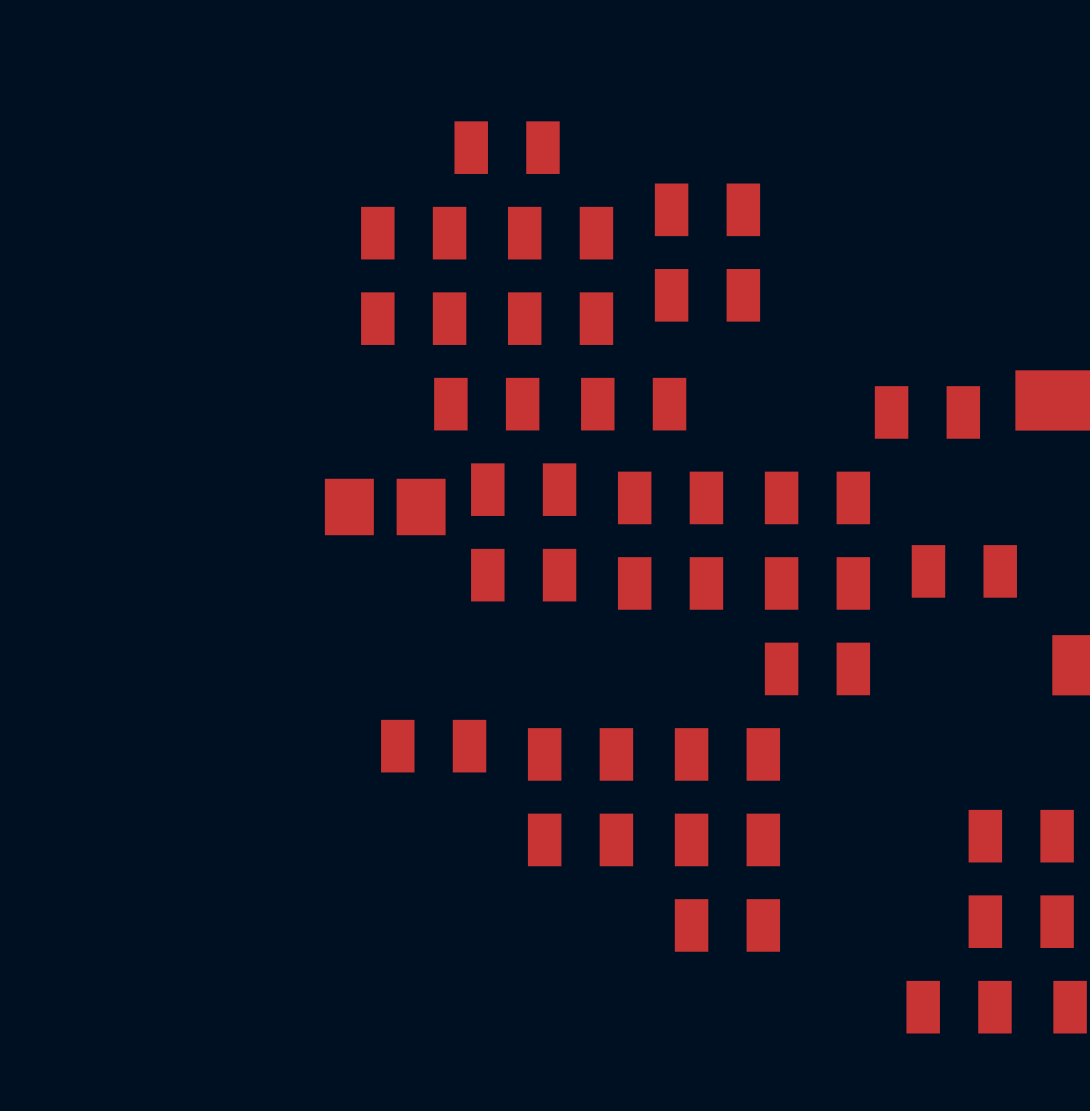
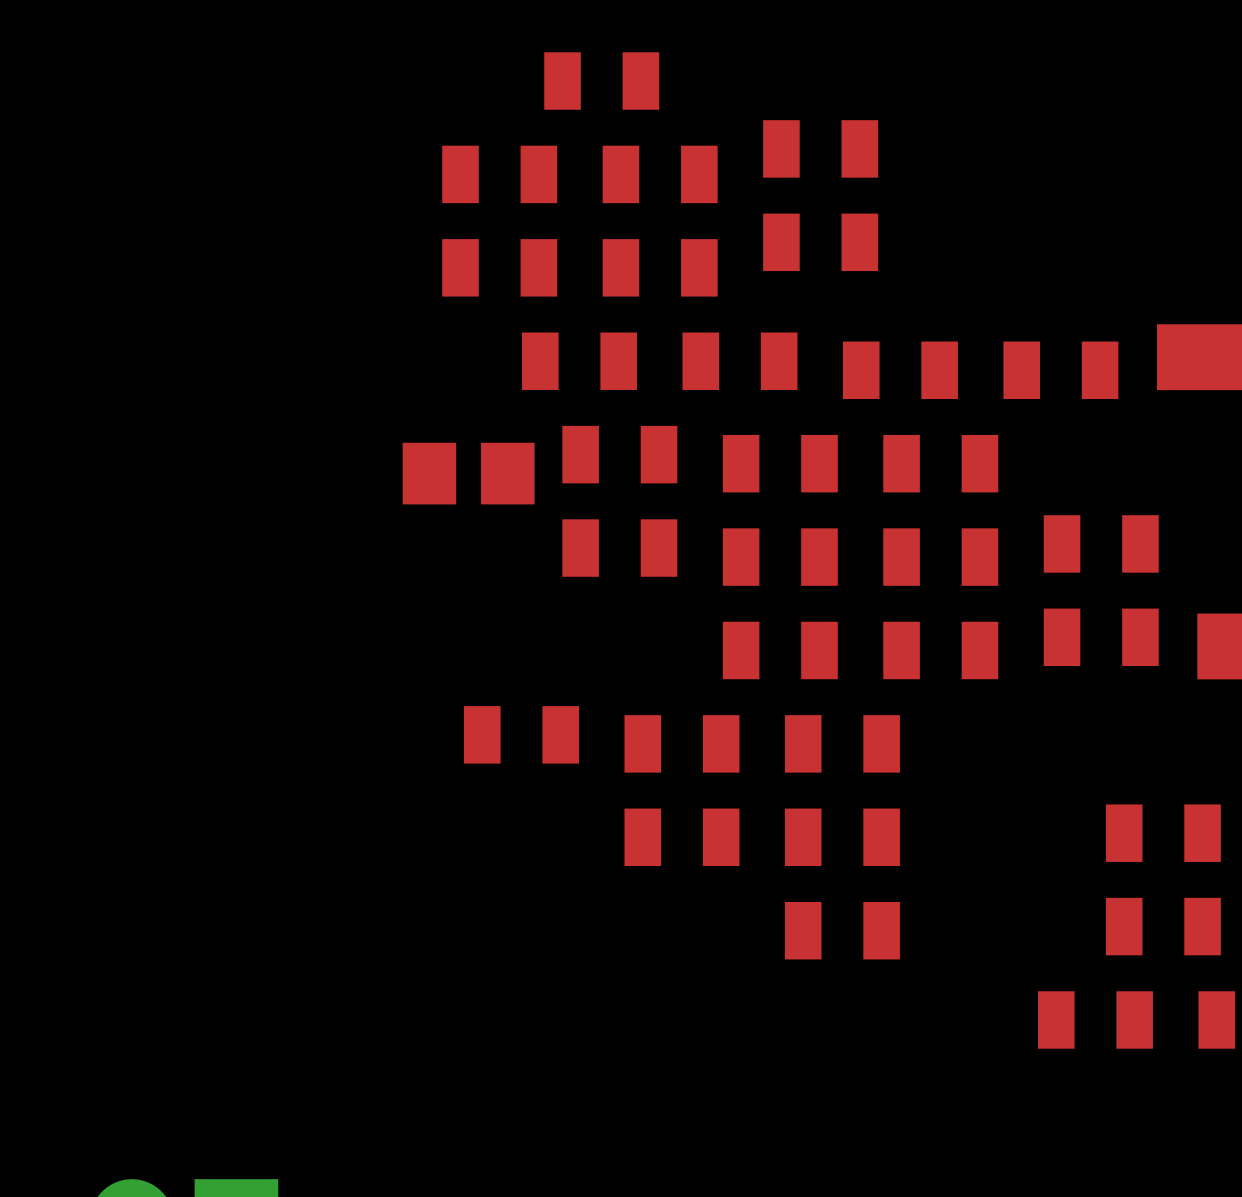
part: none -> (900, 370)
part: none -> (1101, 637)
part: none -> (780, 650)

